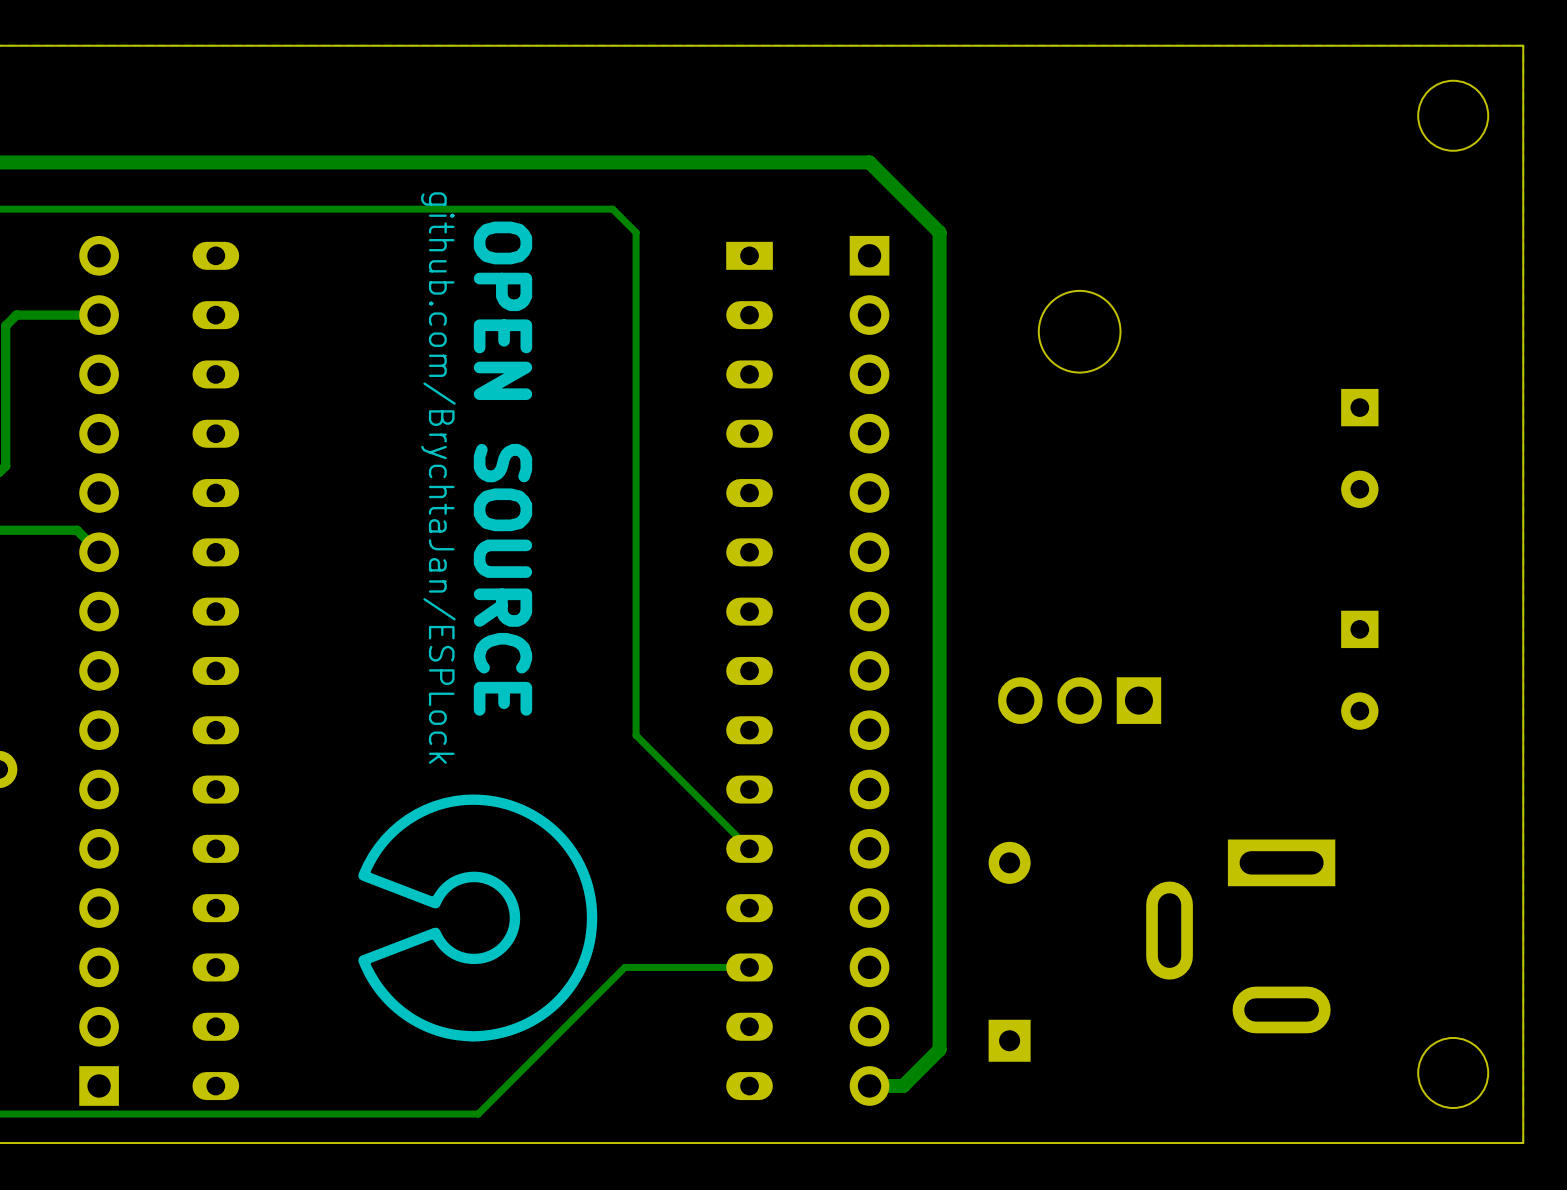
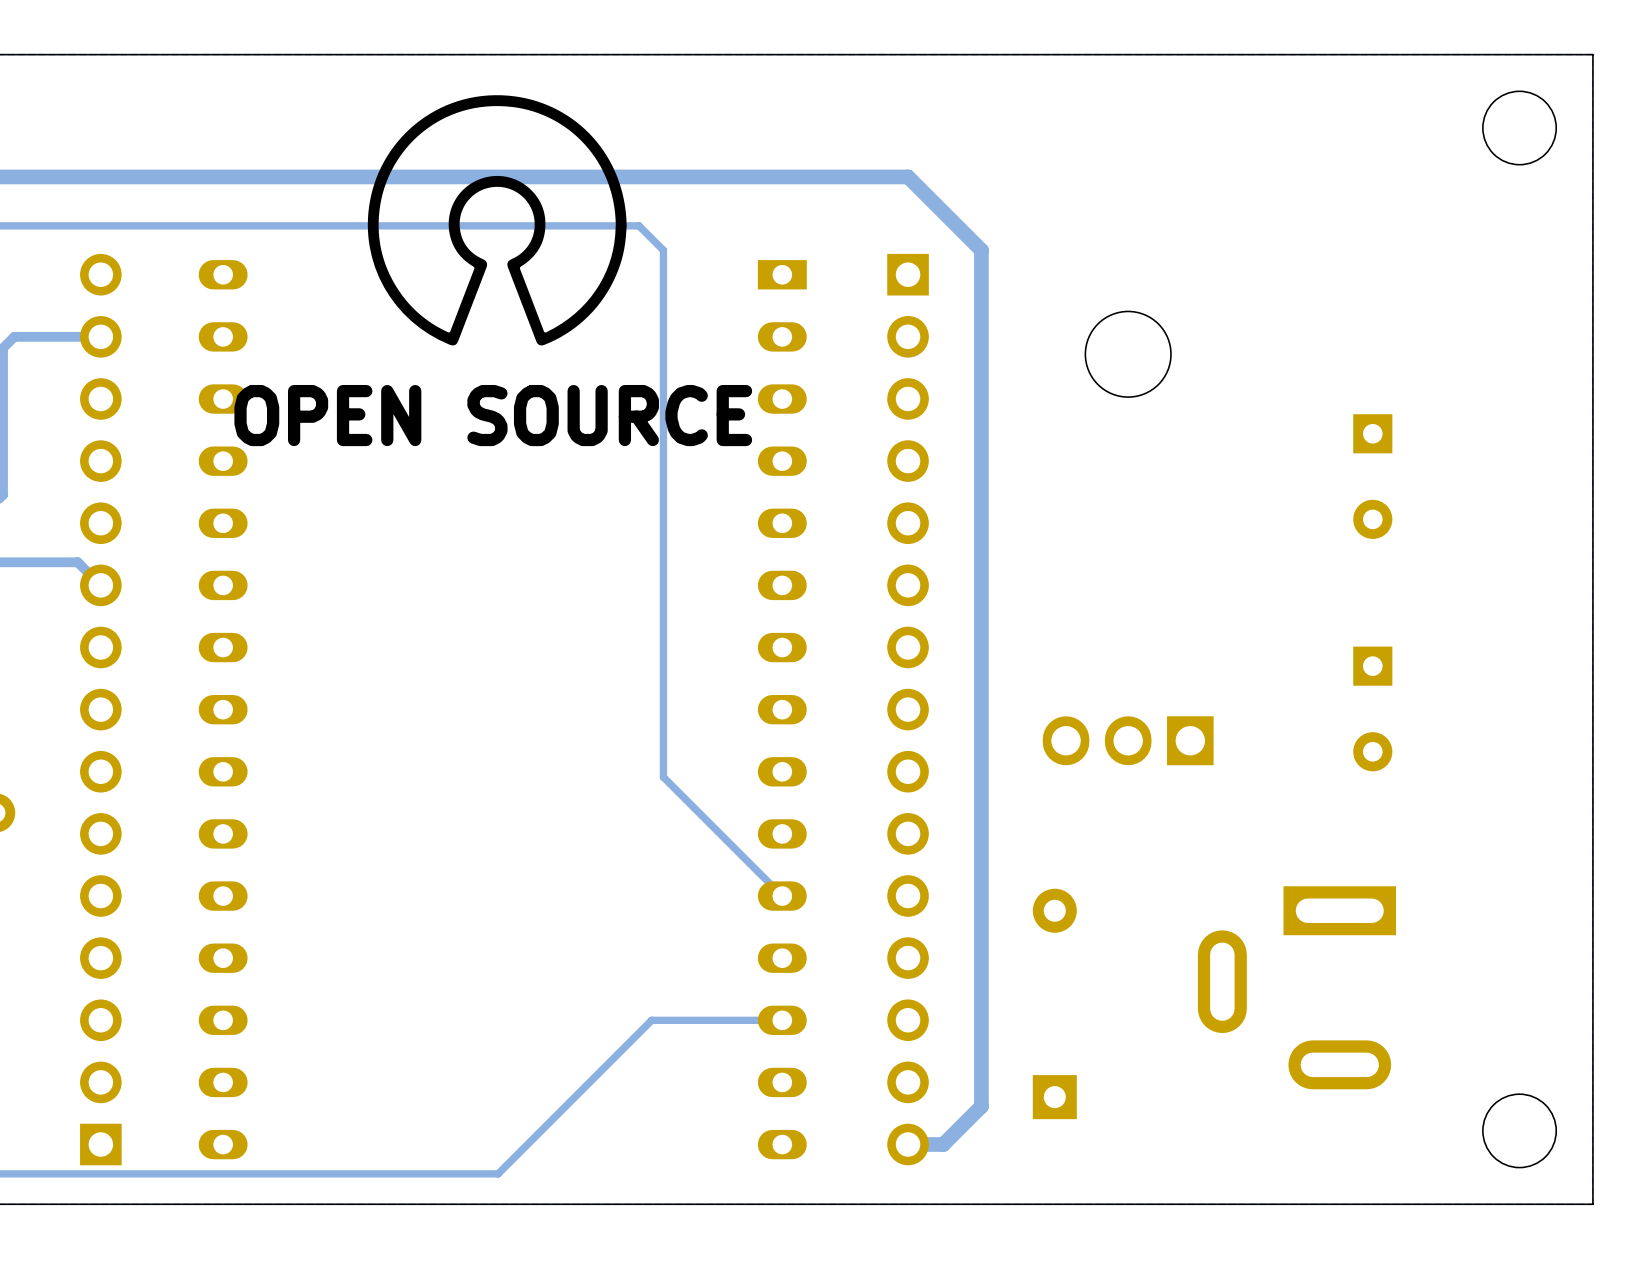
drawing: none -> [367, 95, 627, 346]
part position: (1359, 448) -> (1372, 476)
text rotation: 0° (502, 468) -> 90° counterclockwise (493, 415)
text: github.com/BrychtaJan/ESPLock (438, 478) -> none
part position: (1359, 670) -> (1372, 708)
drawing: [358, 794, 598, 1042] -> none

